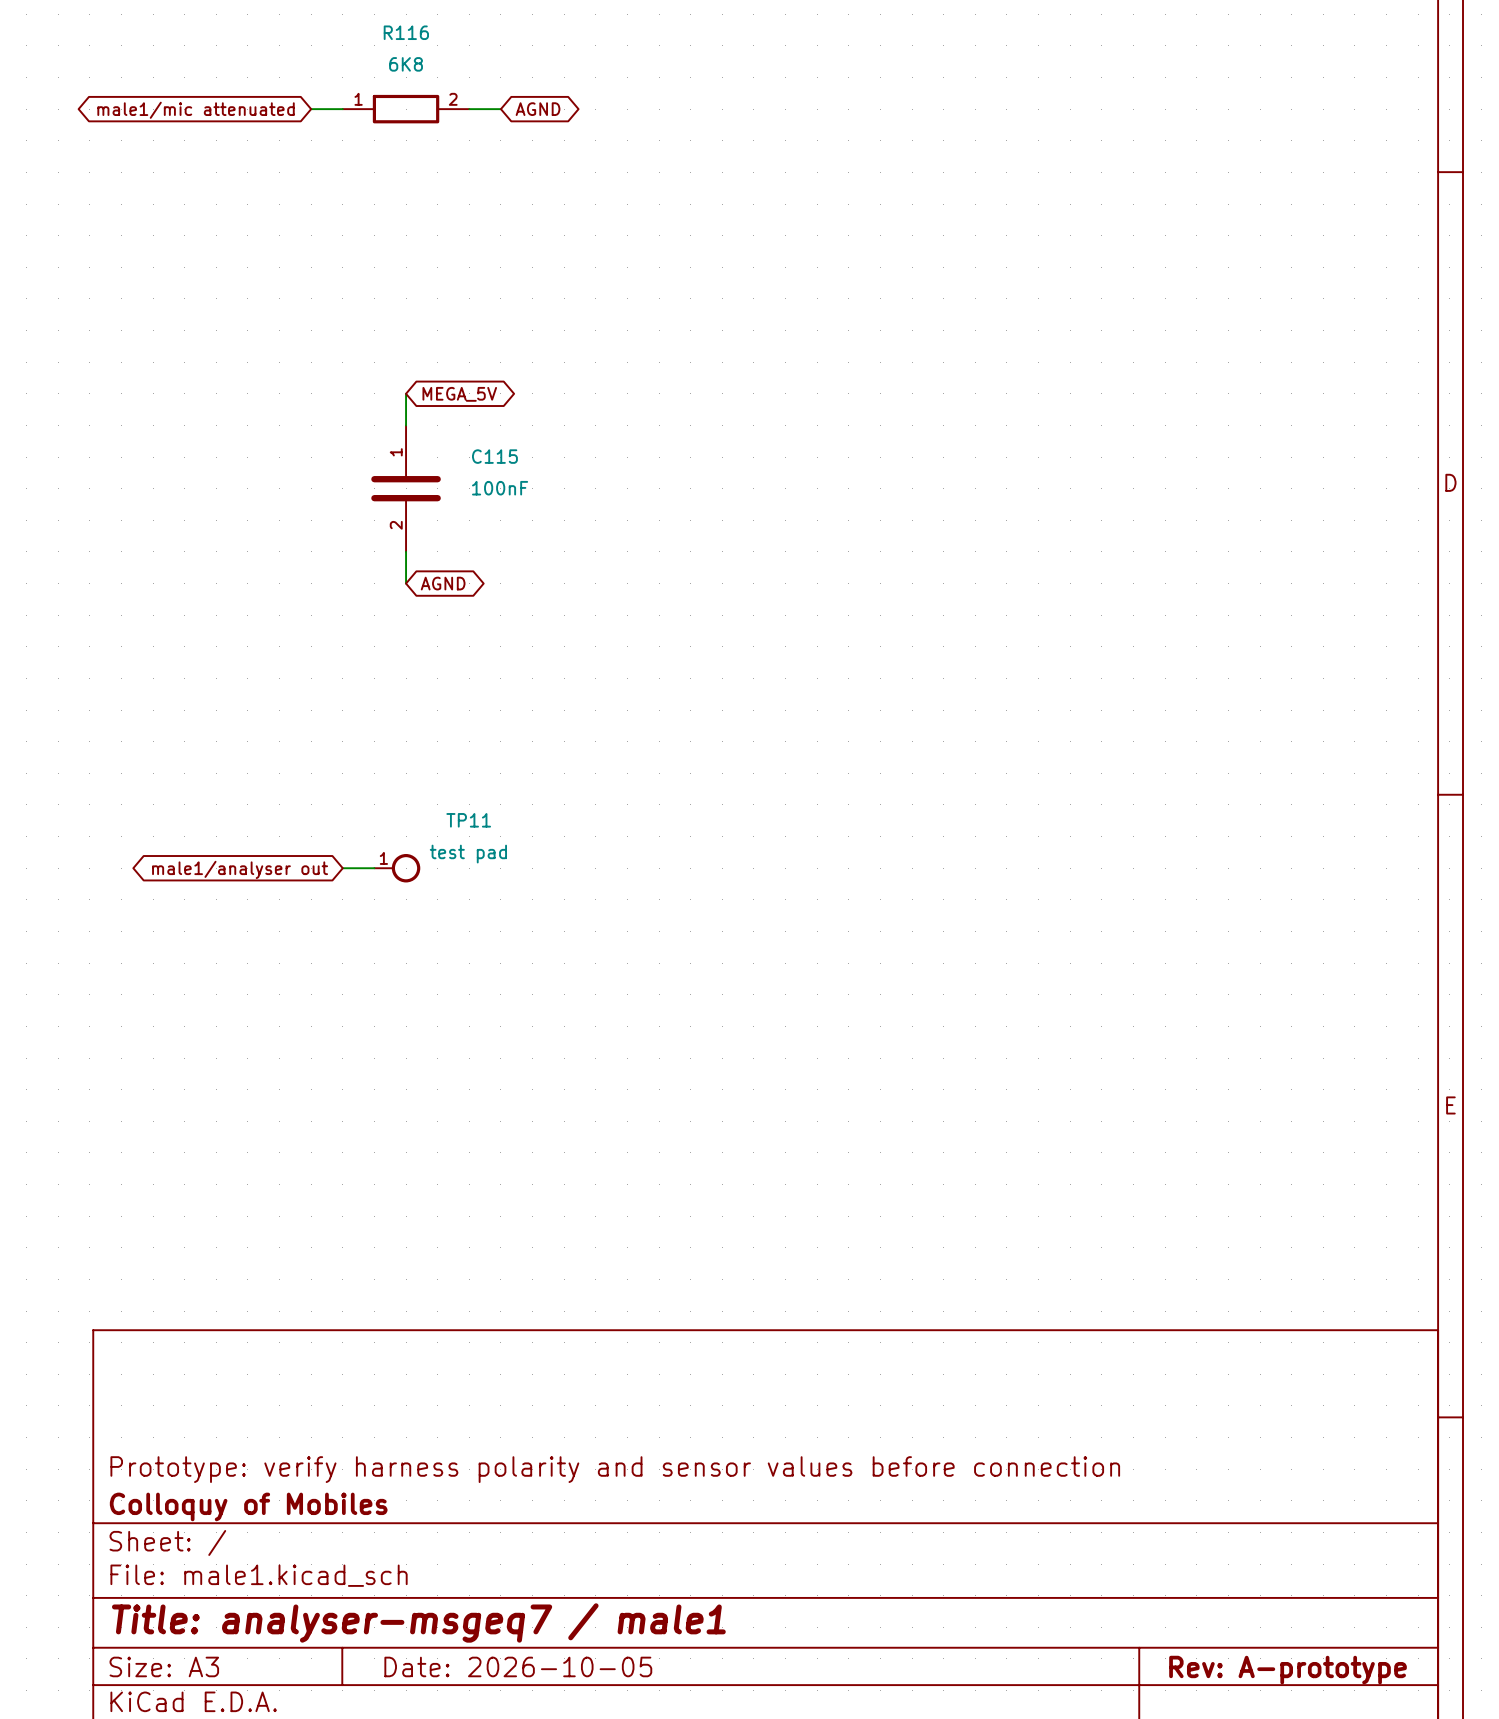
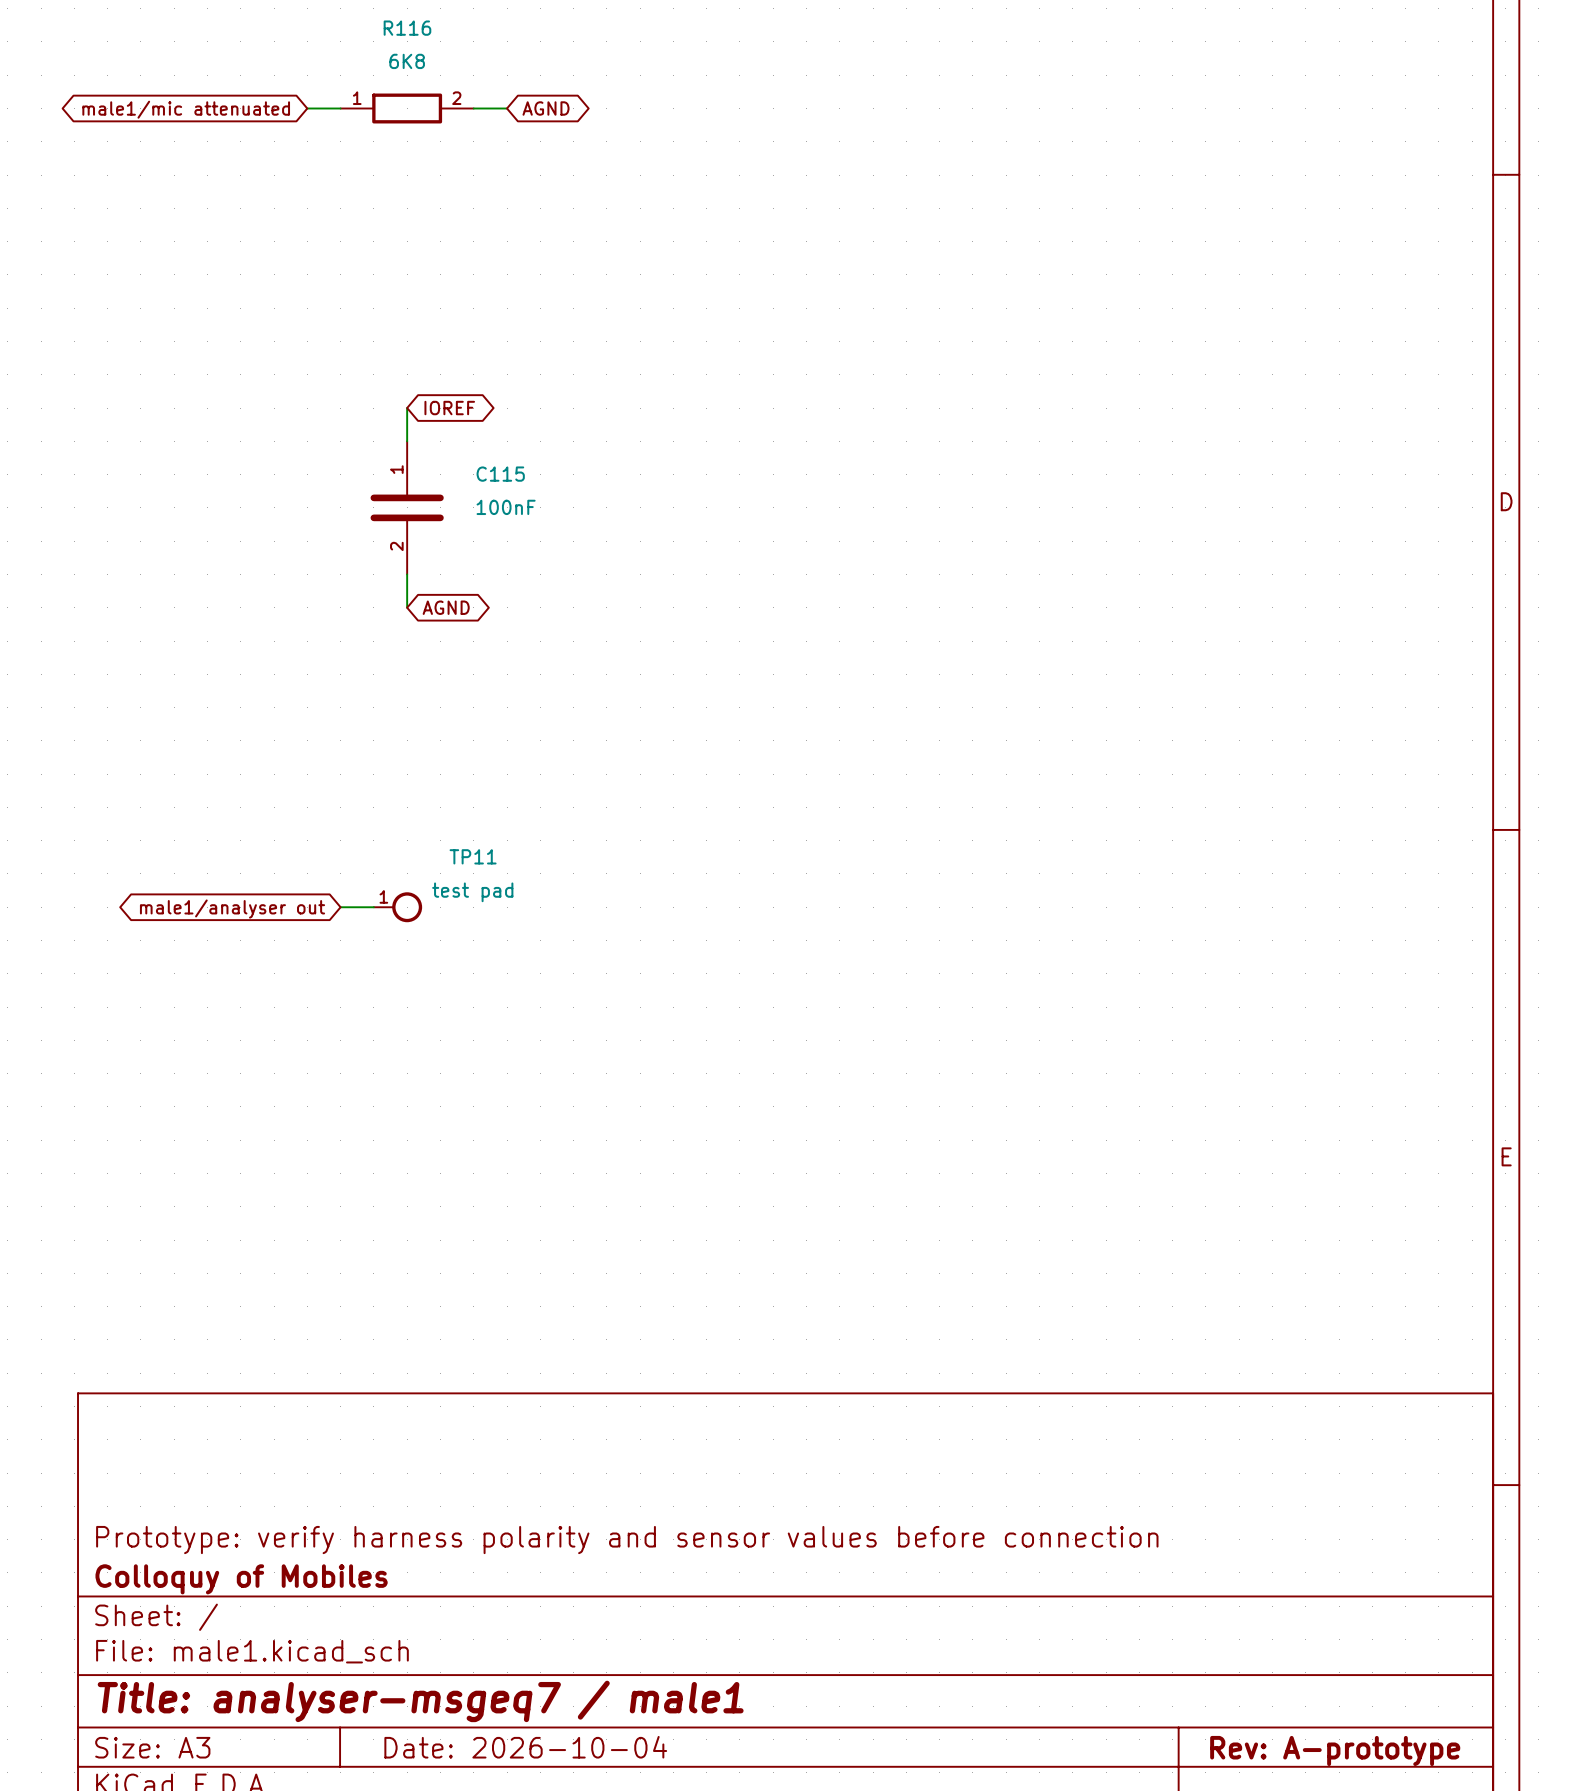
global label: MEGA_5V (459, 394) -> IOREF (449, 408)
title block: Date: 2026-10-05 (518, 1666) -> Date: 2026-10-04 (525, 1747)

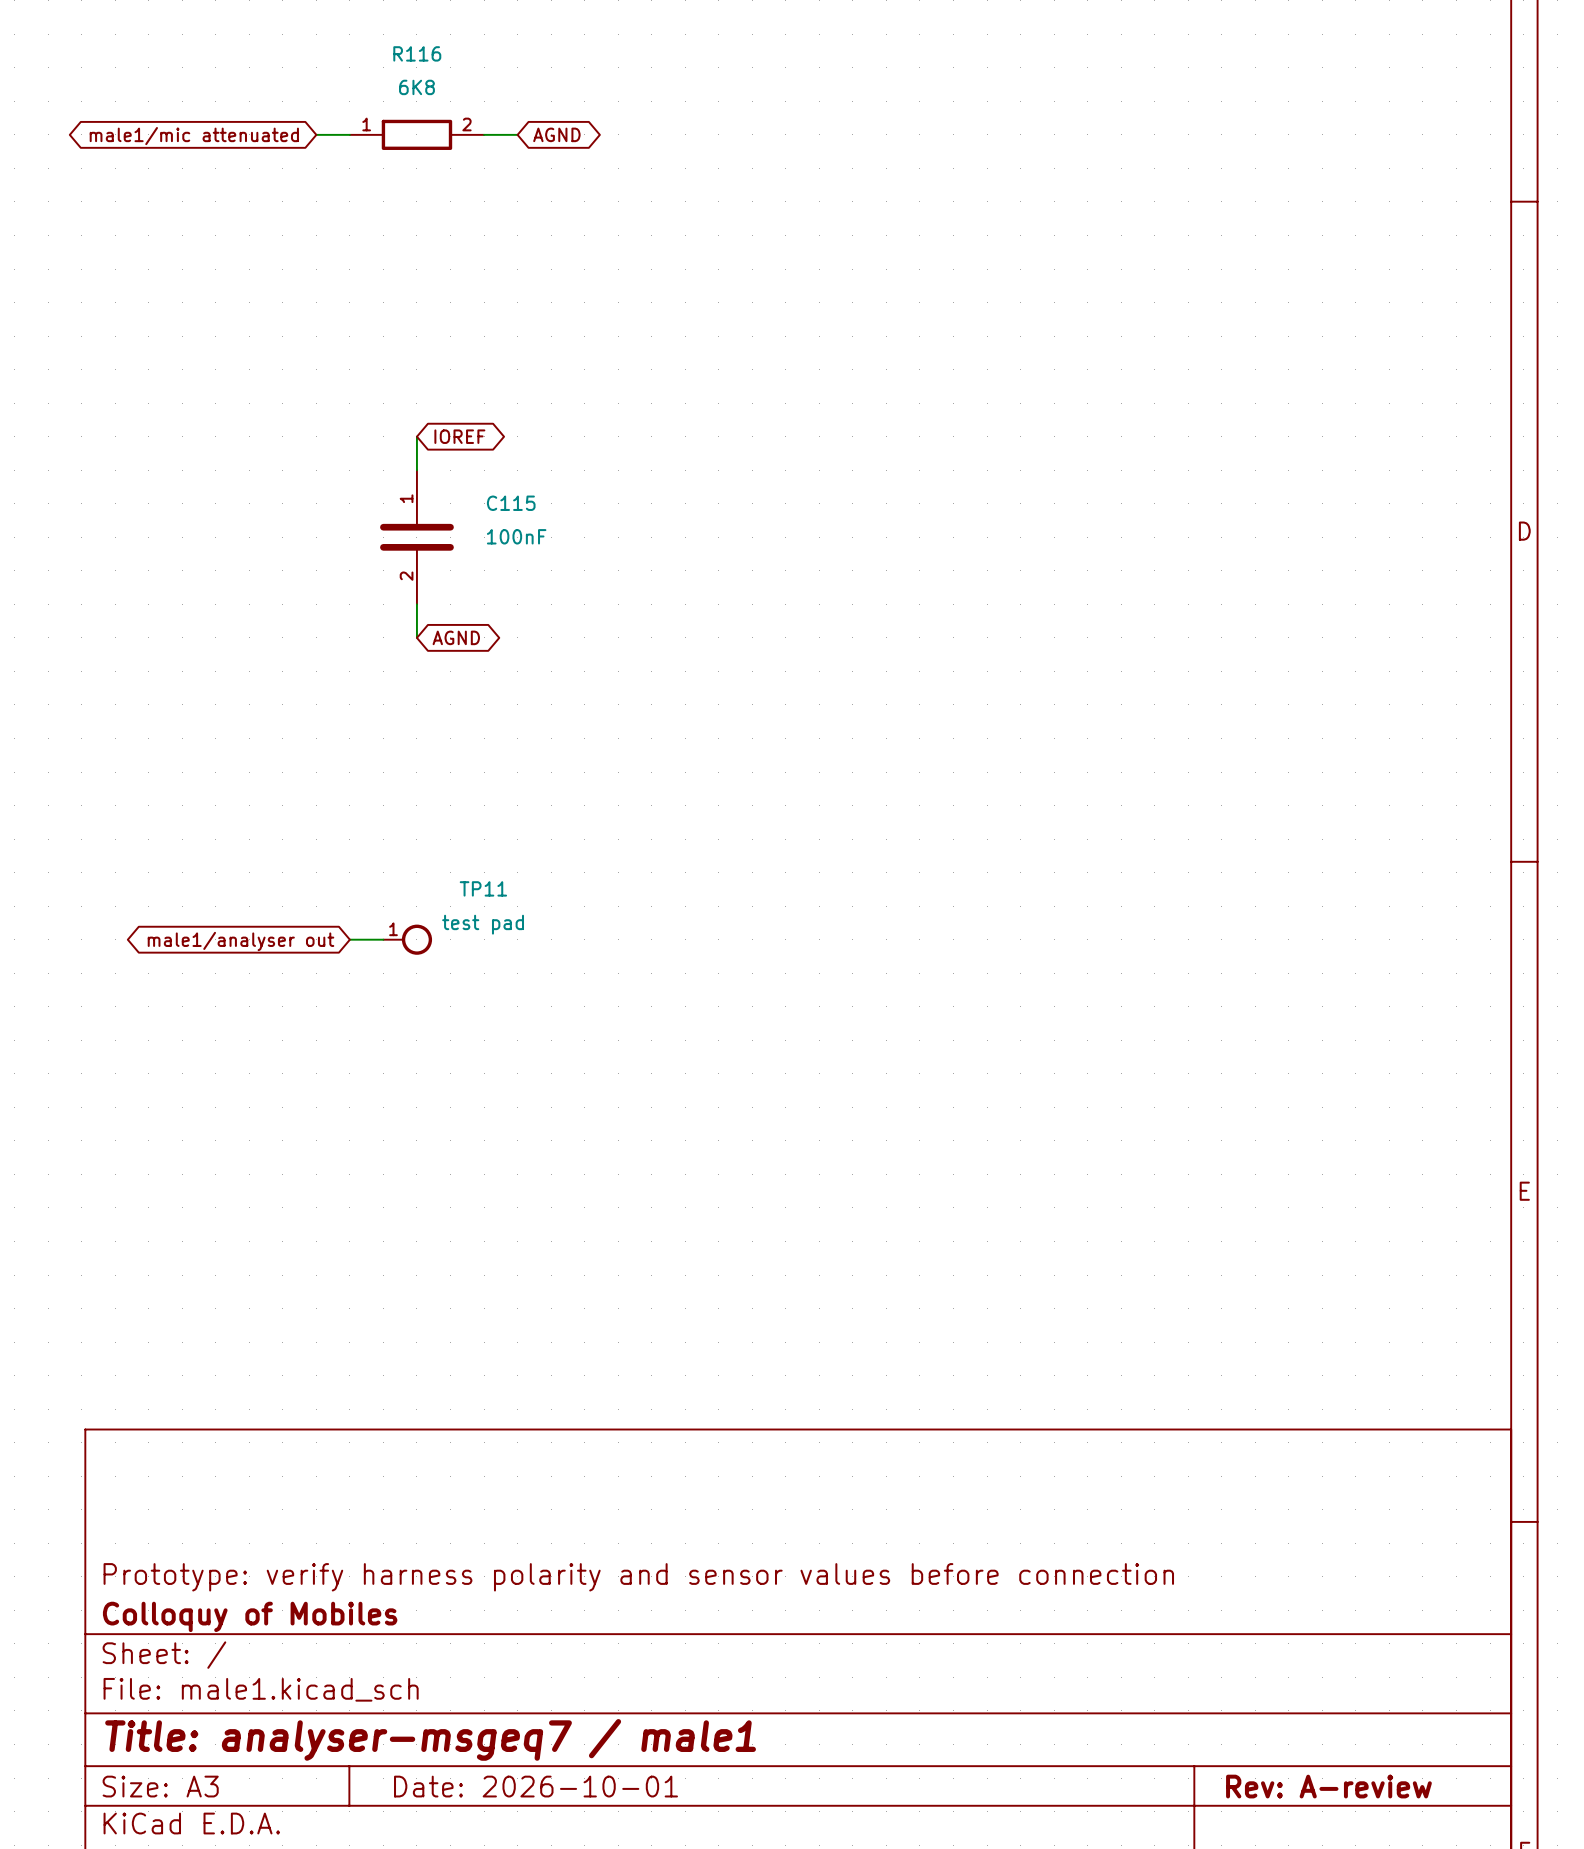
title block: Date: 2026-10-04 (525, 1747) -> Date: 2026-10-01 (536, 1786)
title block: Rev: A-prototype (1335, 1750) -> Rev: A-review (1328, 1786)

